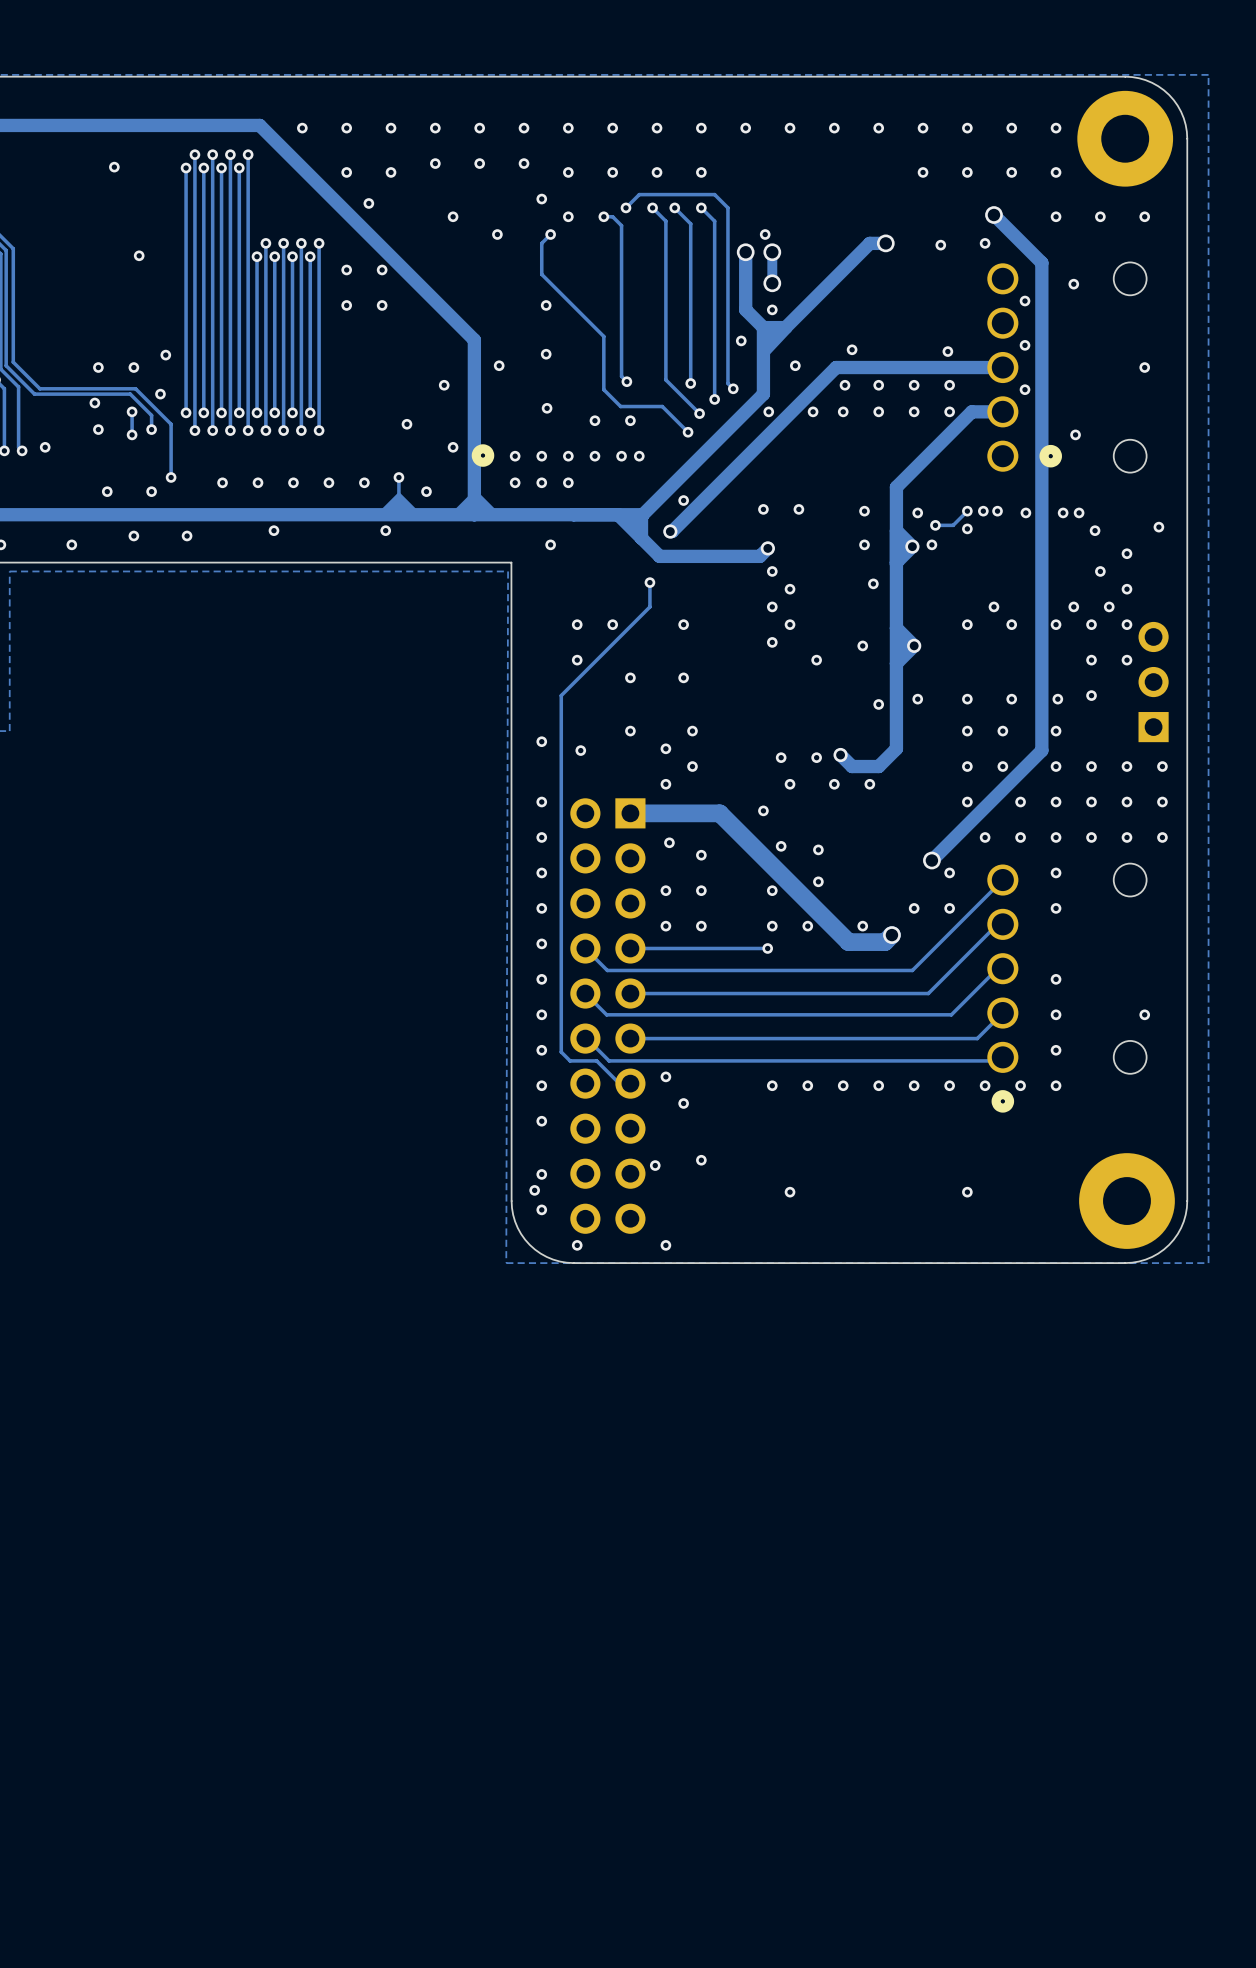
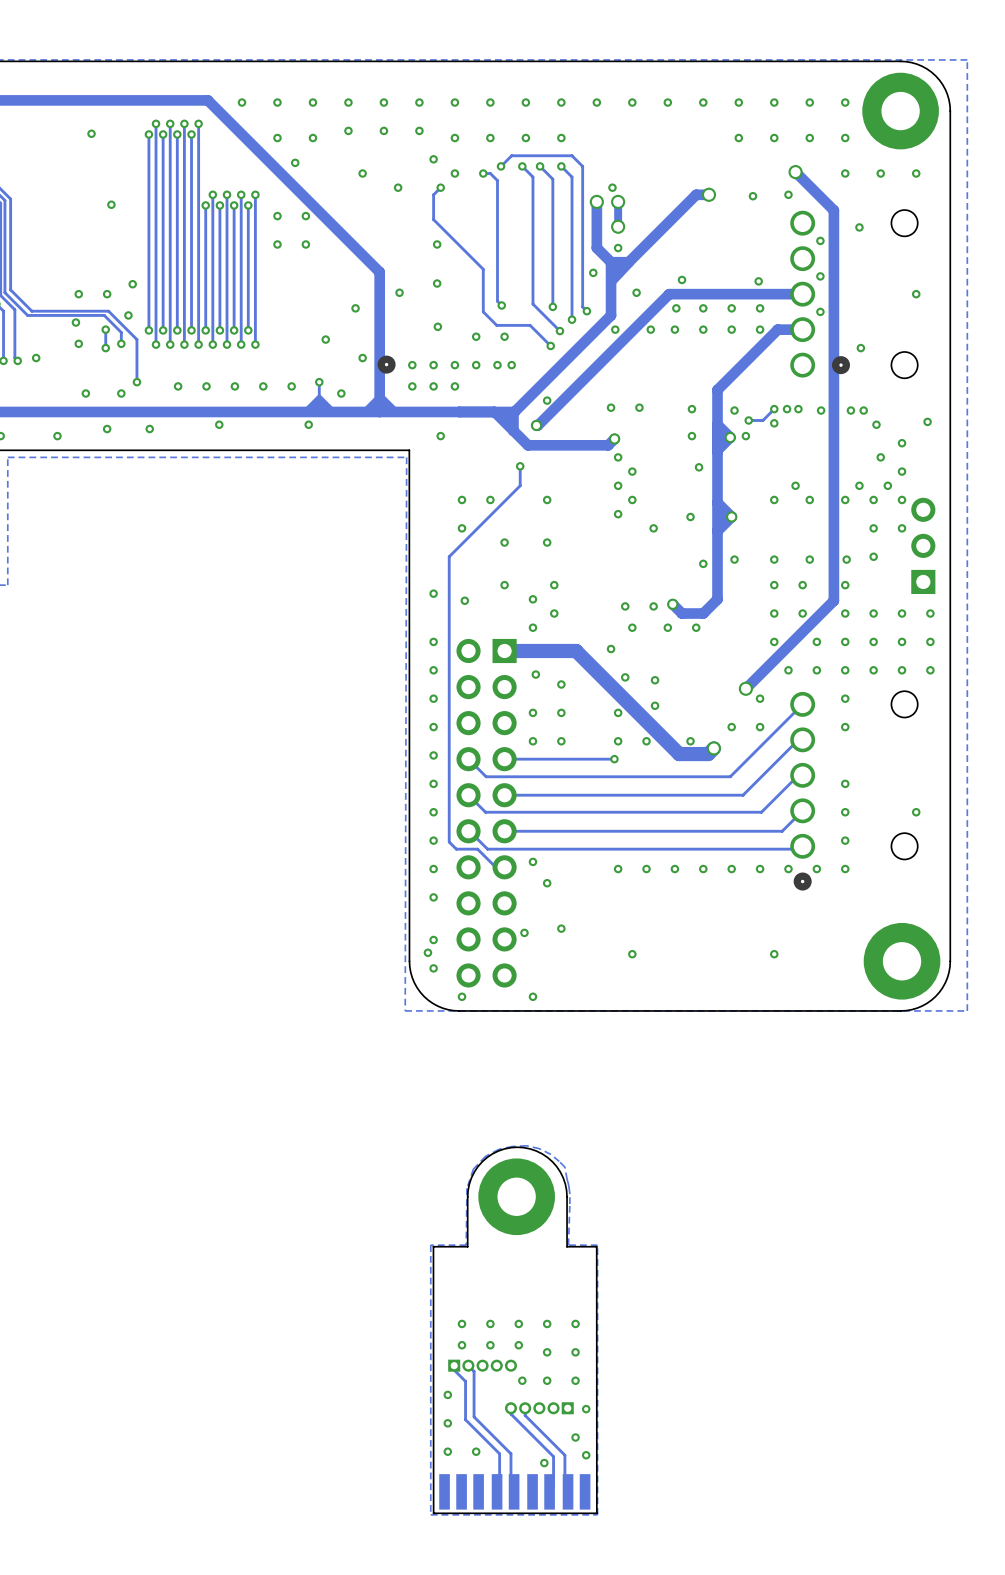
zone outline: none -> (526, 1145) (539, 1148) (550, 1154) (564, 1167) (569, 1194) (568, 1245) (597, 1245) (597, 1514) (430, 1514) (430, 1245) (466, 1245) (466, 1188) (473, 1169) (485, 1156) (498, 1149) (526, 1145)
part: none -> (516, 1196)
board edge: none -> (567, 1196) (567, 1246) (596, 1246) (596, 1513) (433, 1513) (433, 1246) (467, 1246) (469, 1184) (474, 1172) (482, 1161) (498, 1151) (510, 1147) (523, 1147) (536, 1151) (547, 1157) (556, 1166) (563, 1177) (567, 1196)
via: none -> (462, 1323)
via: none -> (490, 1323)
via: none -> (518, 1323)
via: none -> (547, 1323)
via: none -> (575, 1323)
via: none -> (462, 1345)
via: none -> (490, 1345)
via: none -> (518, 1345)
via: none -> (547, 1352)
via: none -> (575, 1352)
track: none -> (454, 1365) (454, 1370) (465, 1381) (465, 1419) (499, 1453) (499, 1489) (497, 1491)
track: none -> (468, 1365) (474, 1371) (474, 1416) (510, 1453) (510, 1488) (514, 1491)
part: none -> (482, 1365)
via: none -> (522, 1380)
via: none -> (547, 1380)
via: none -> (575, 1380)
via: none -> (447, 1394)
track: none -> (510, 1408) (510, 1414) (553, 1456) (553, 1487) (549, 1491)
track: none -> (525, 1408) (525, 1415) (564, 1455) (564, 1488) (568, 1491)
part: none -> (539, 1408)
via: none -> (586, 1409)
via: none -> (447, 1423)
via: none -> (575, 1437)
via: none -> (447, 1451)
via: none -> (476, 1451)
via: none -> (586, 1455)
via: none -> (544, 1463)
part: none -> (514, 1491)

